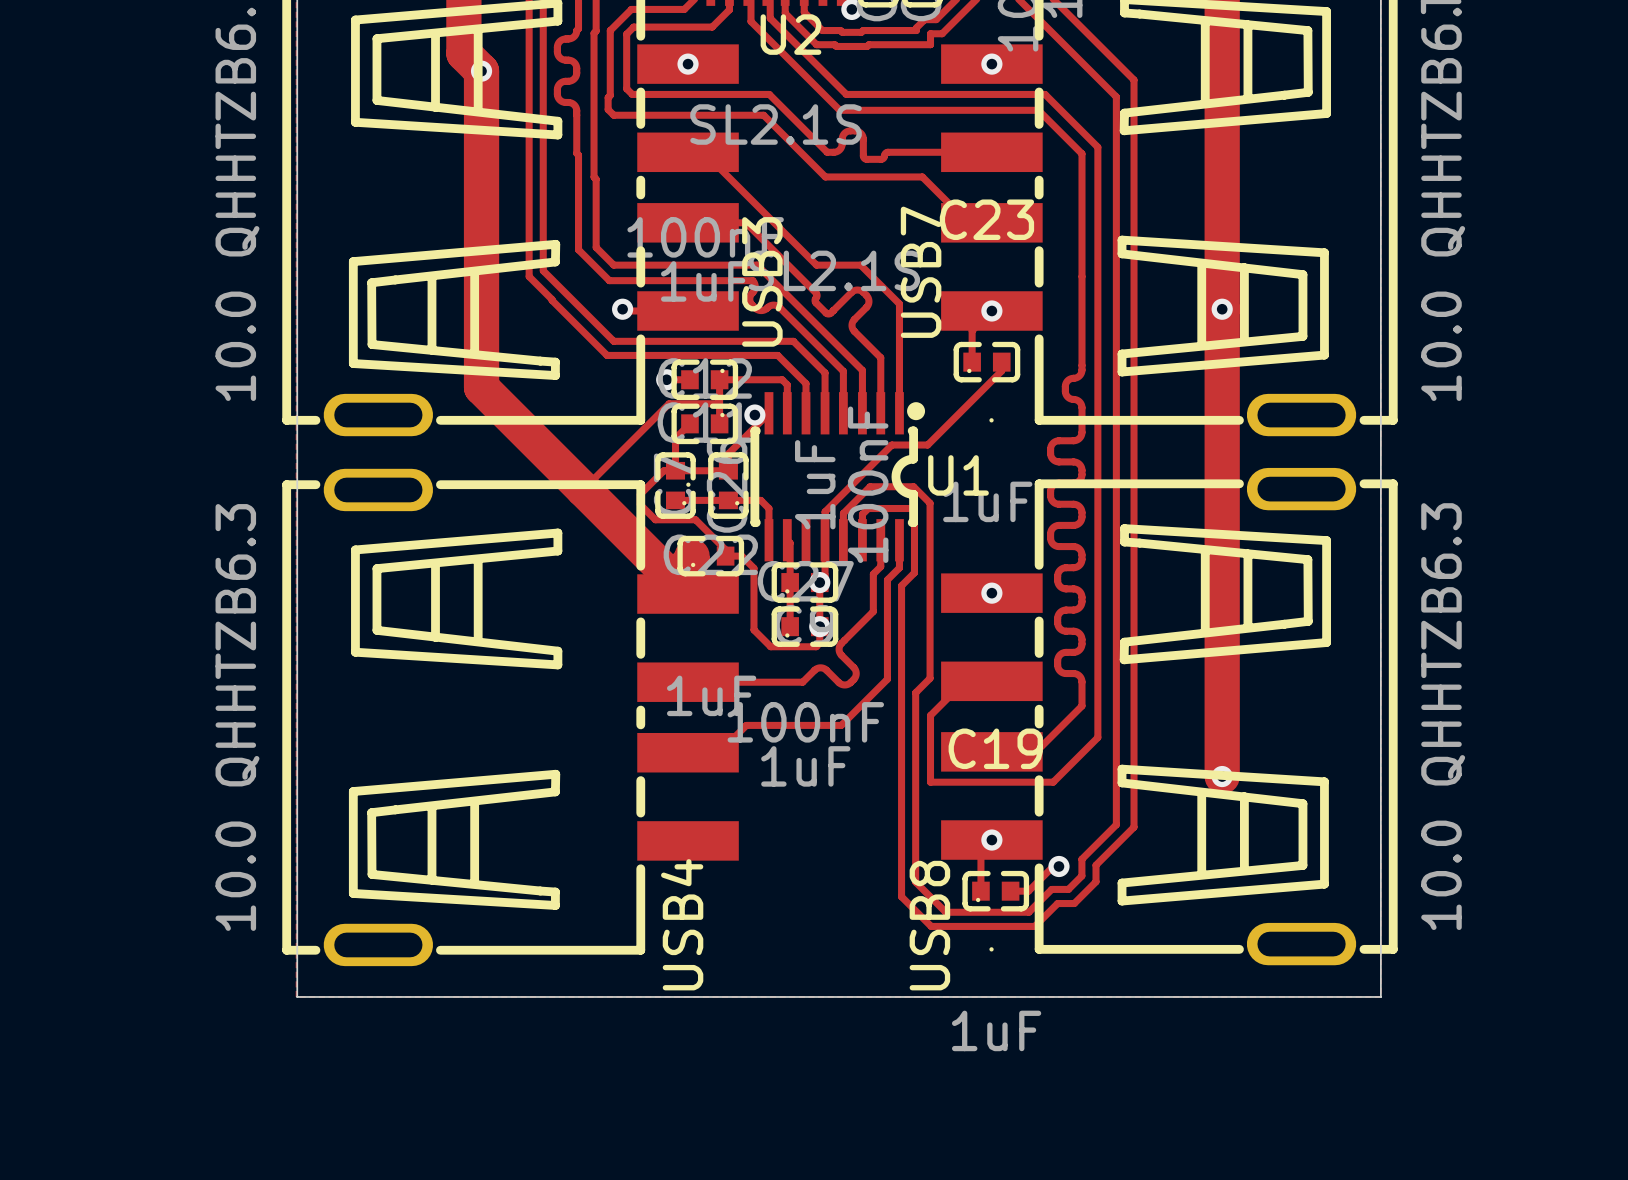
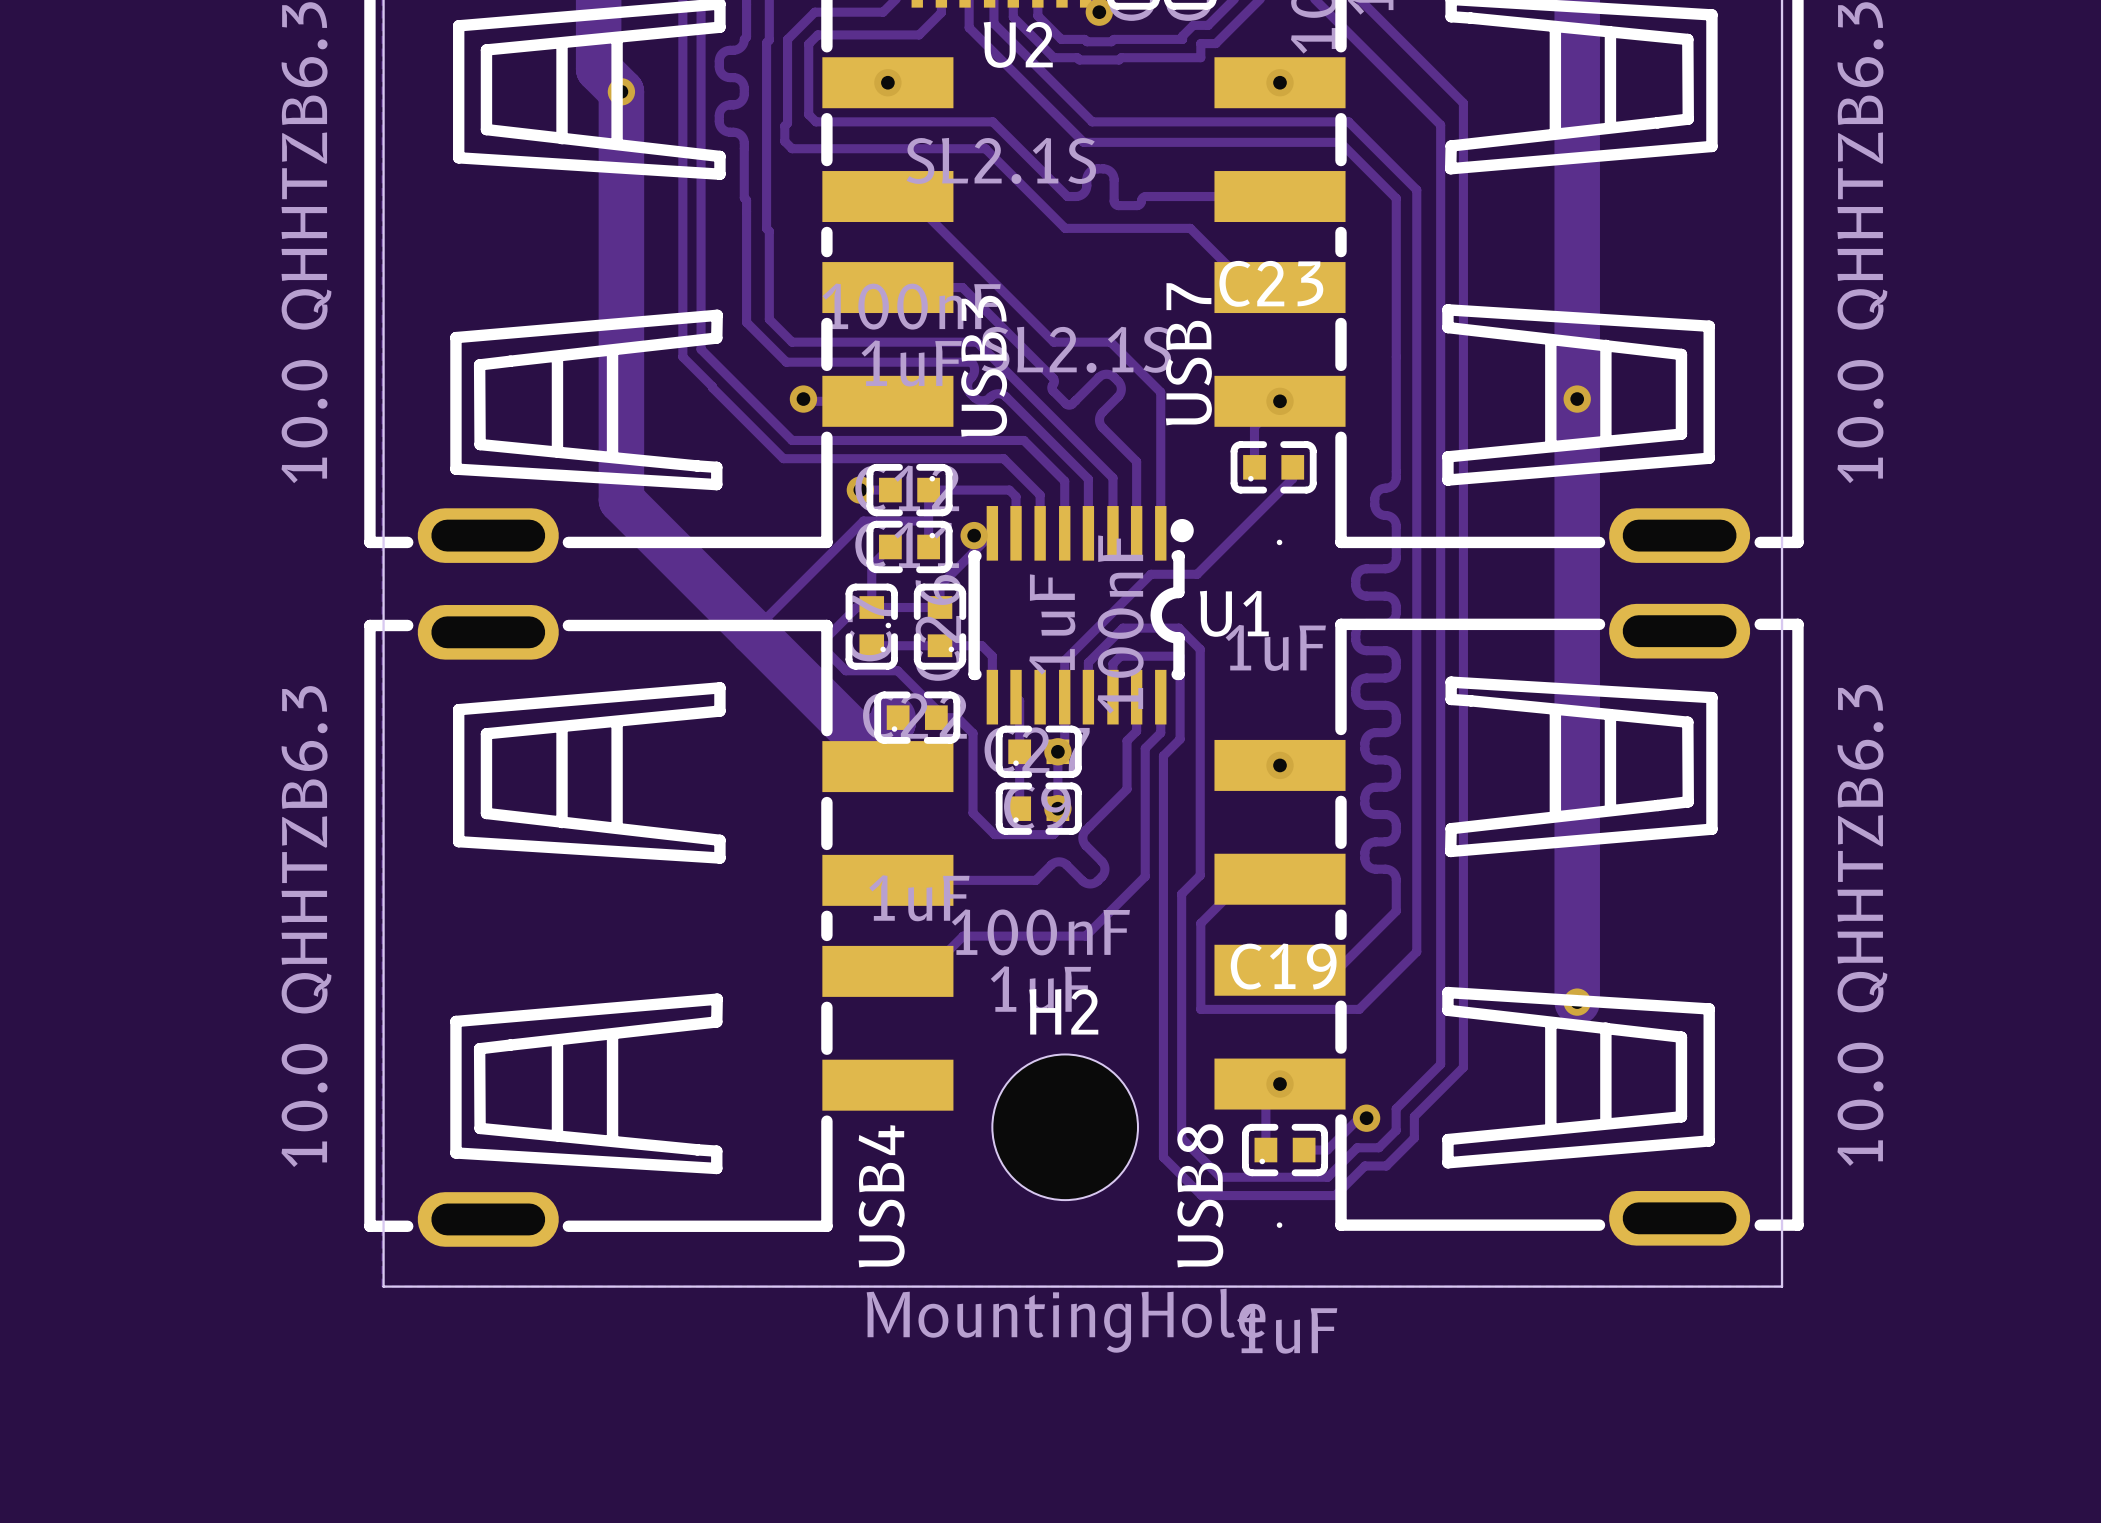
H2: none -> MountingHole (1065, 1127)

